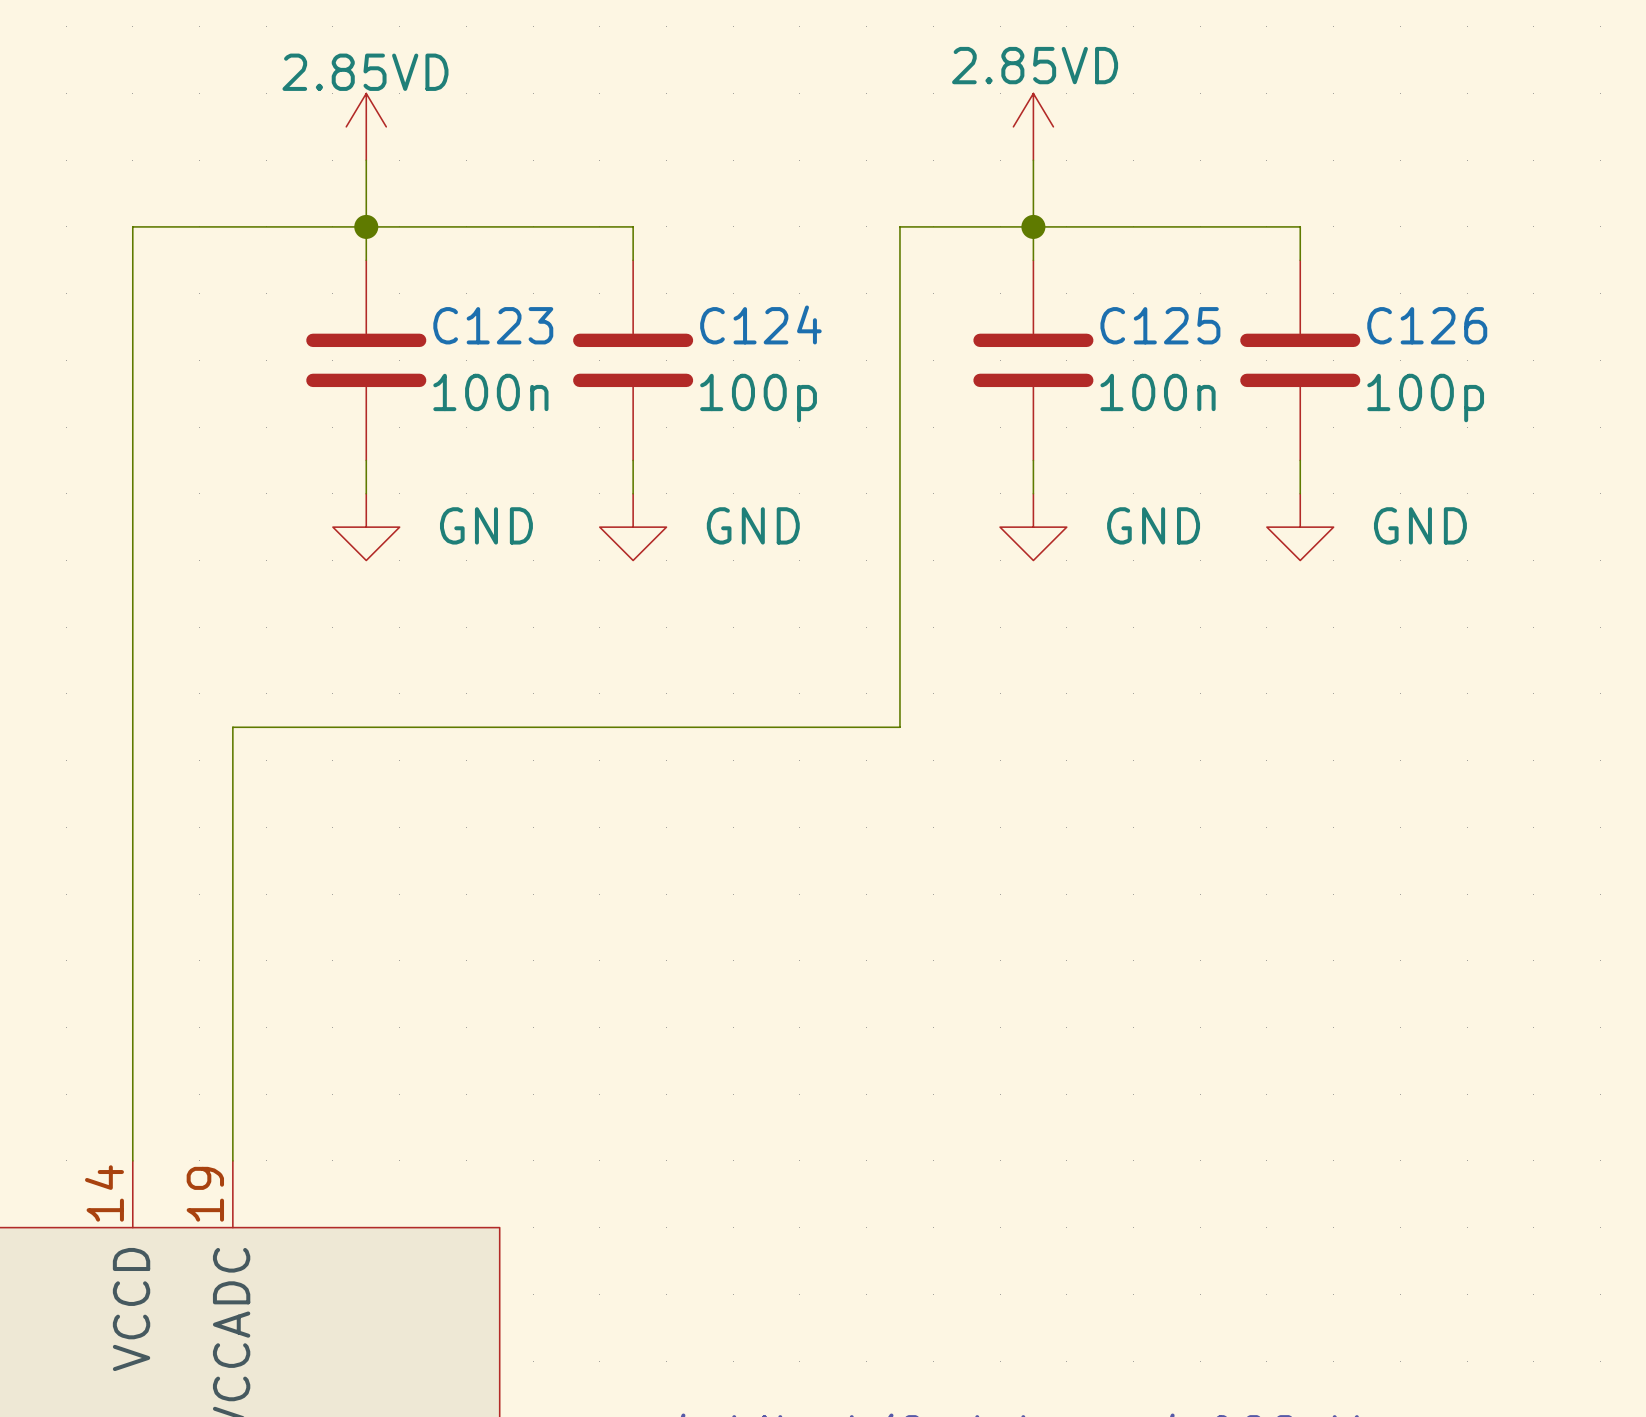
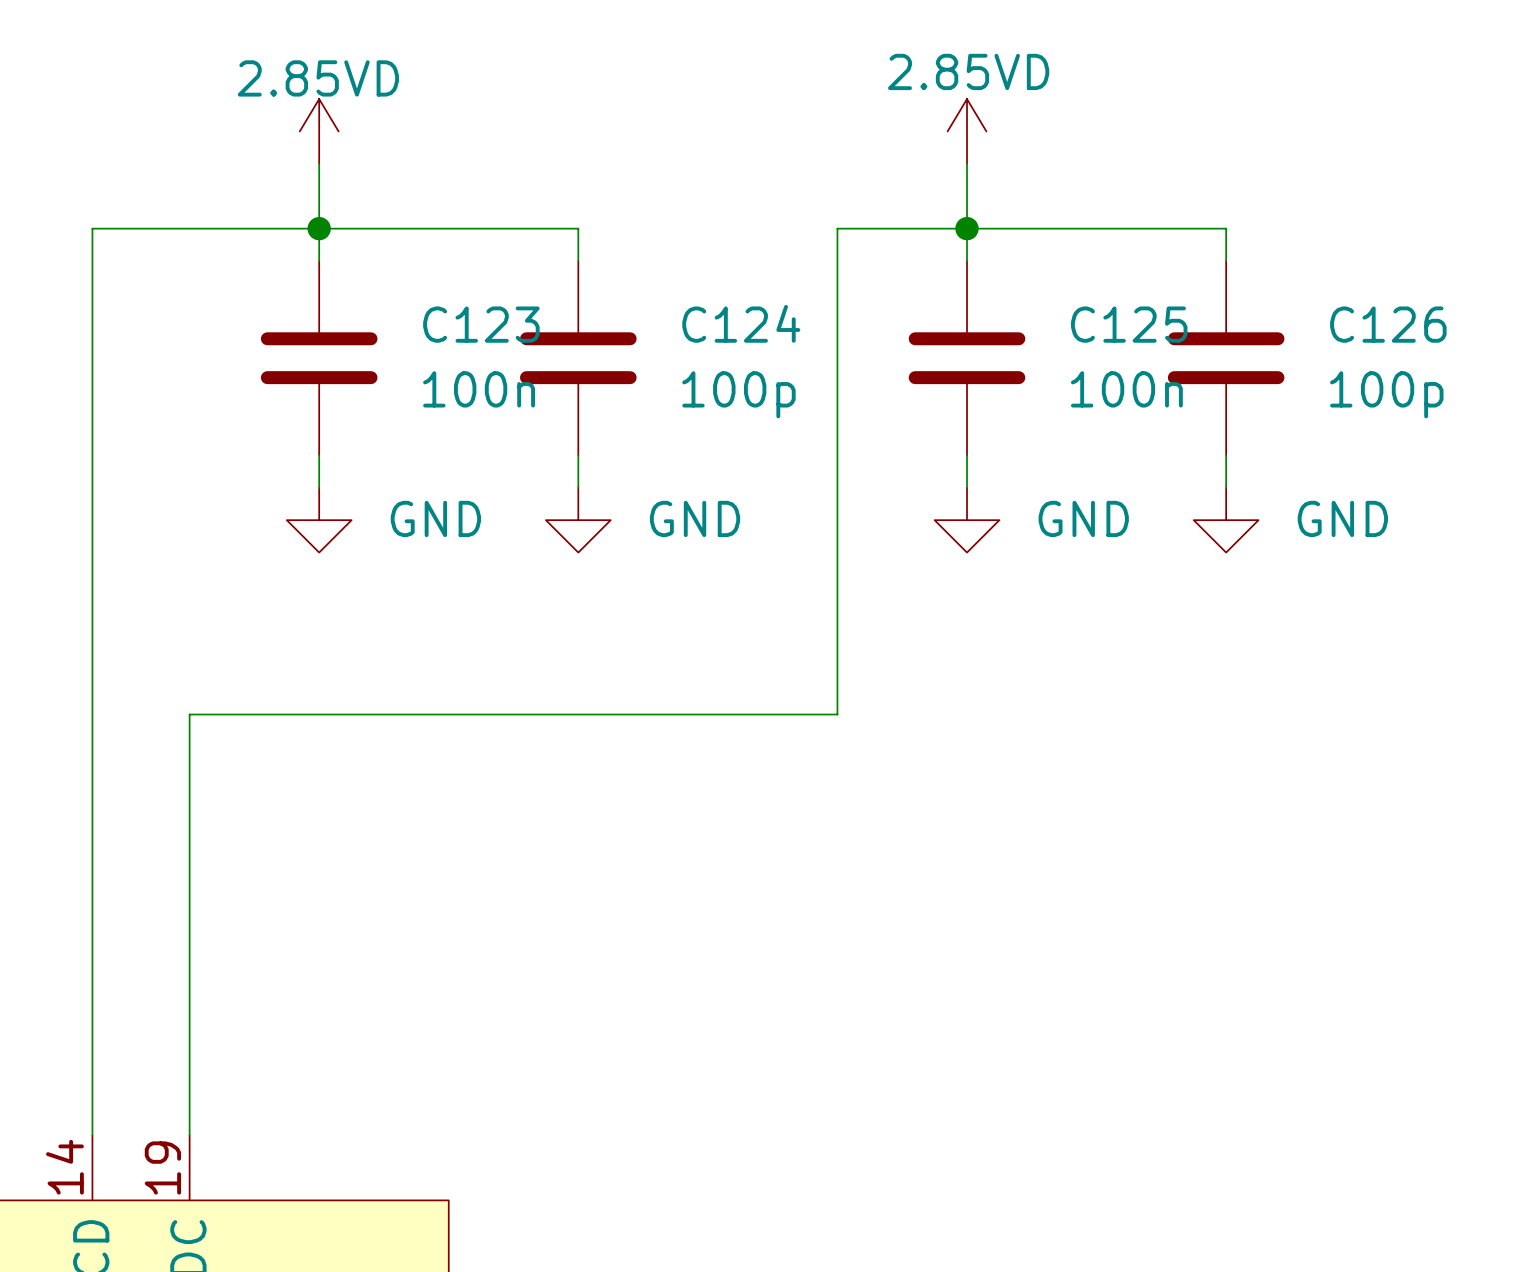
C124 name position: C124 (760, 324) -> C124 (741, 323)
C123 name position: C123 (493, 325) -> C123 (481, 324)
C125 name position: C125 (1160, 325) -> C125 (1129, 324)
C126 name position: C126 (1427, 325) -> C126 (1388, 324)
C123 value position: 100n (490, 392) -> 100n (479, 389)
C125 value position: 100n (1158, 392) -> 100n (1126, 389)
C124 value position: 100p (758, 398) -> 100p (738, 394)
C126 value position: 100p (1425, 398) -> 100p (1386, 394)

